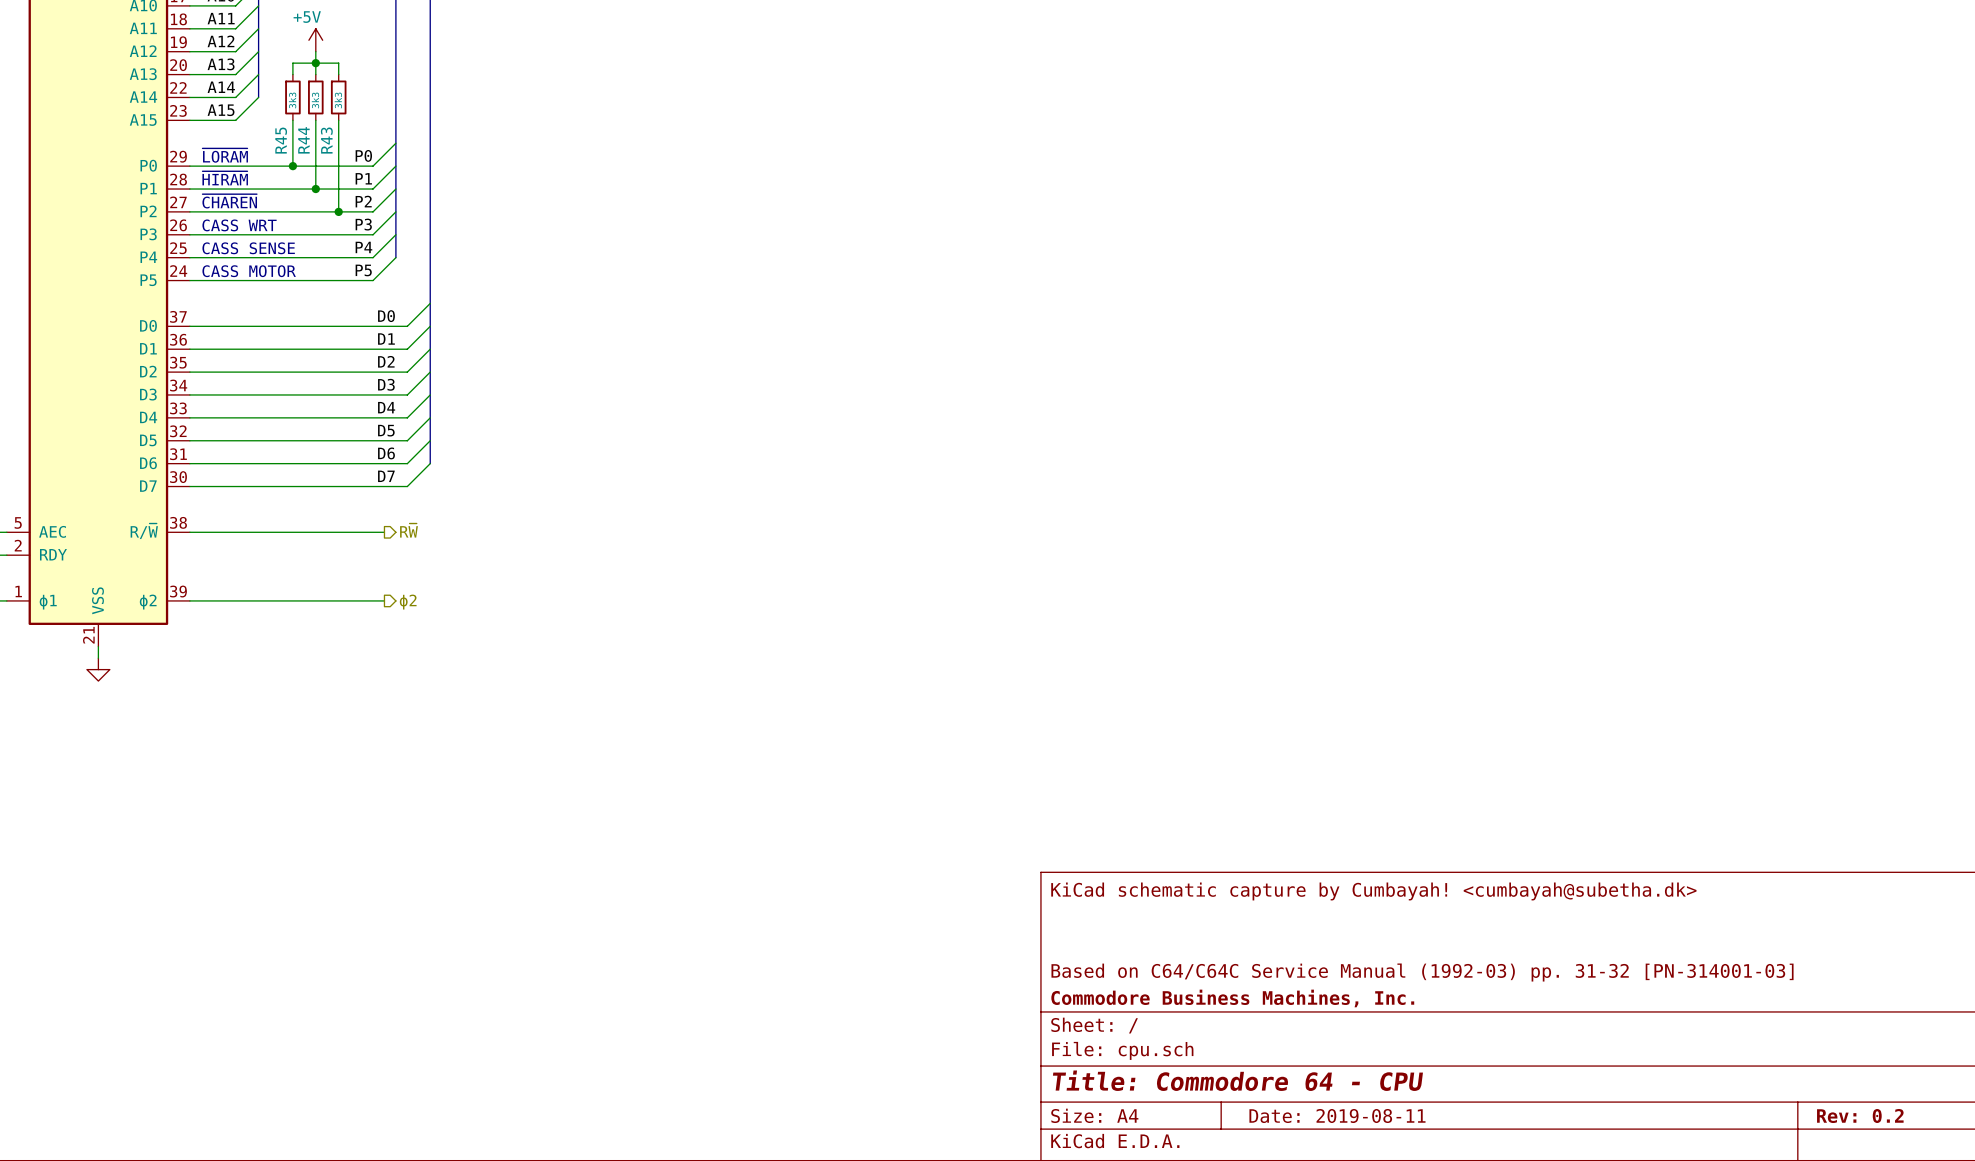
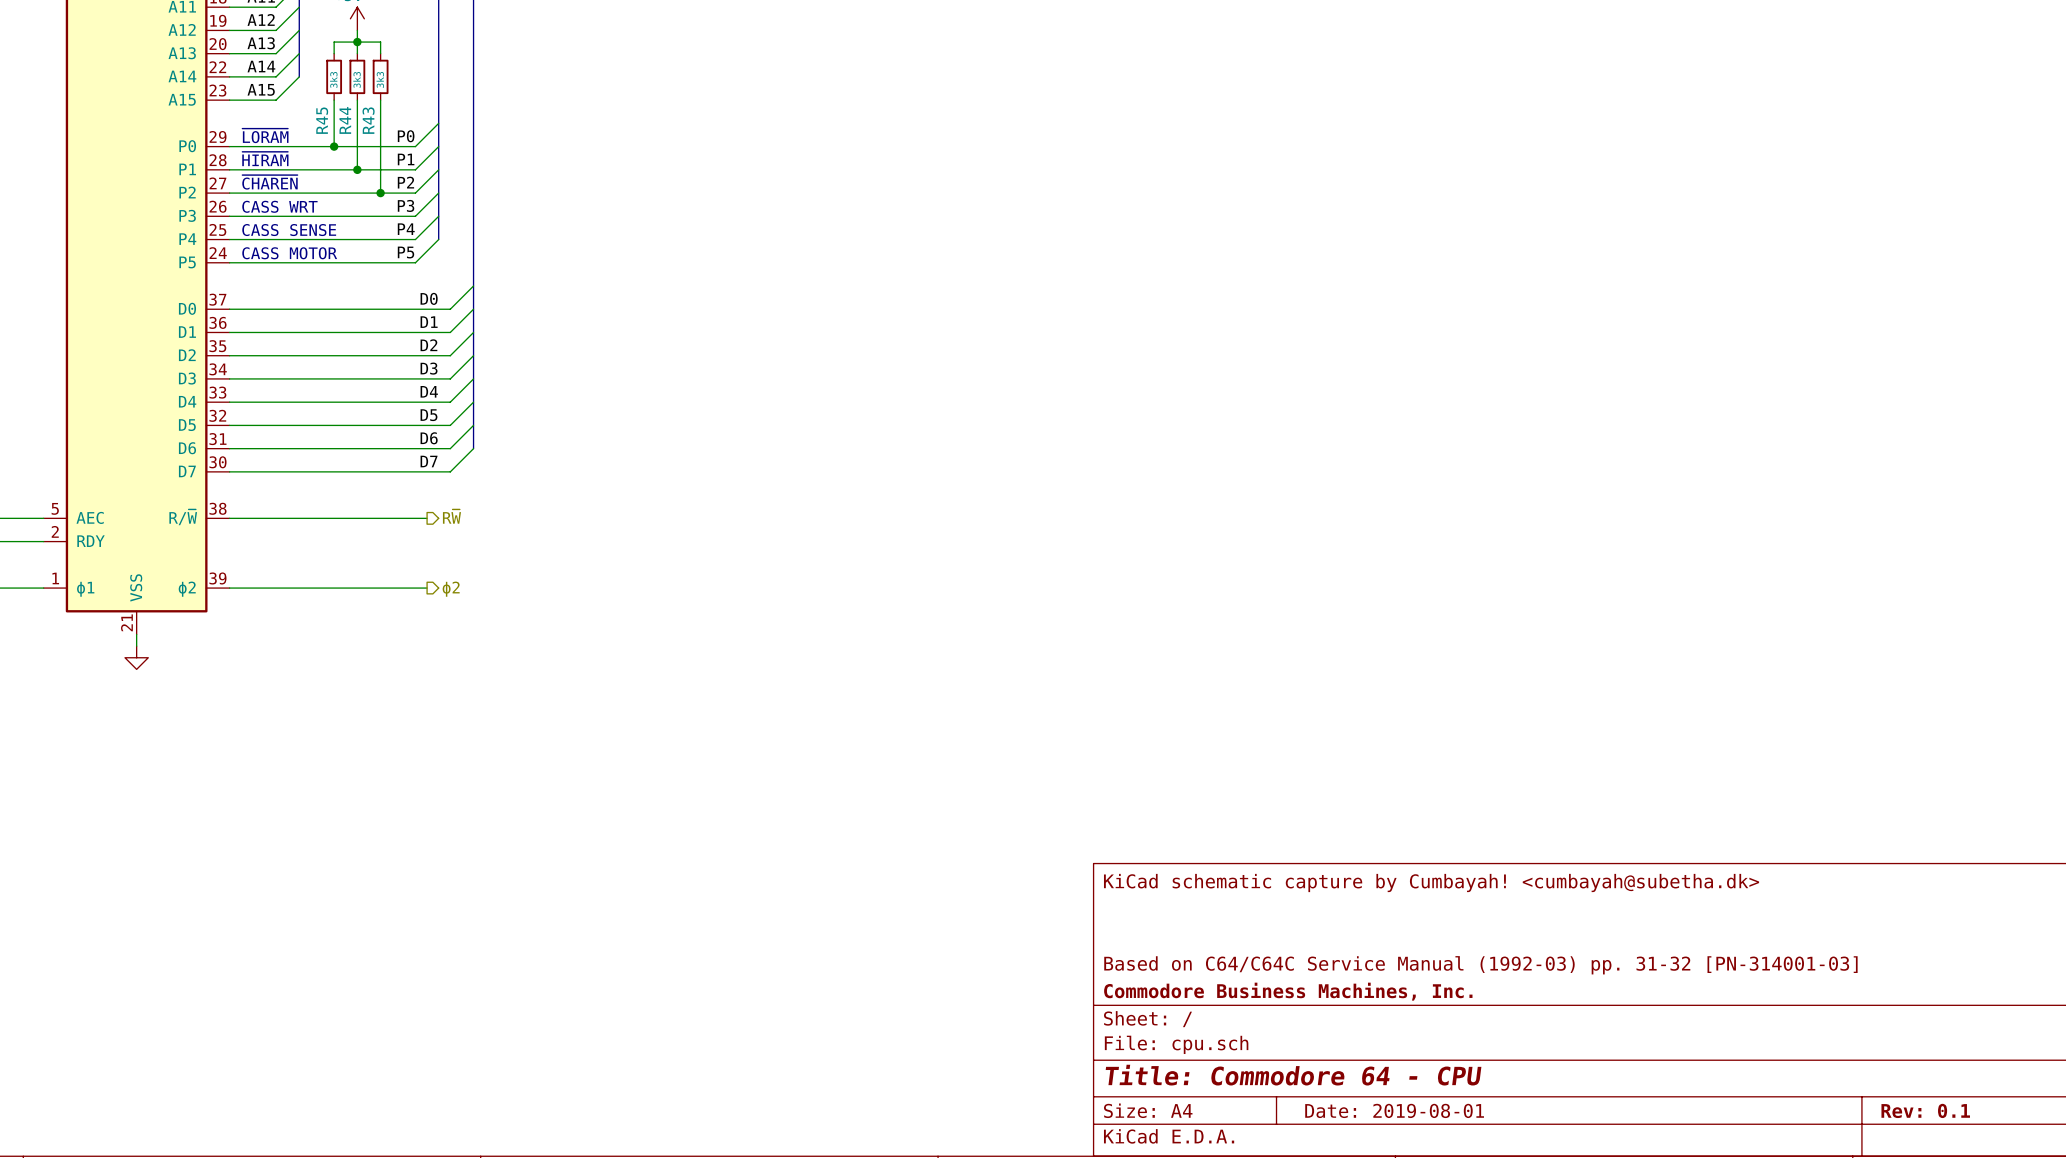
title block: Date: 2019-08-11 (1337, 1116) -> Date: 2019-08-01 (1394, 1110)
title block: Rev: 0.2 (1860, 1116) -> Rev: 0.1 (1925, 1110)

